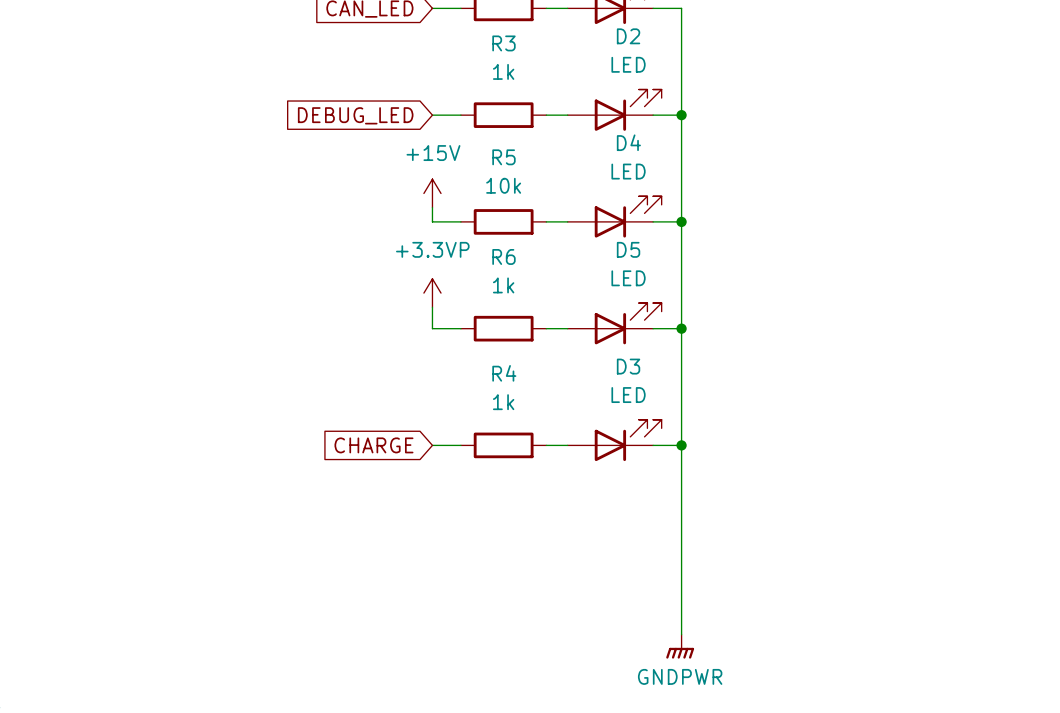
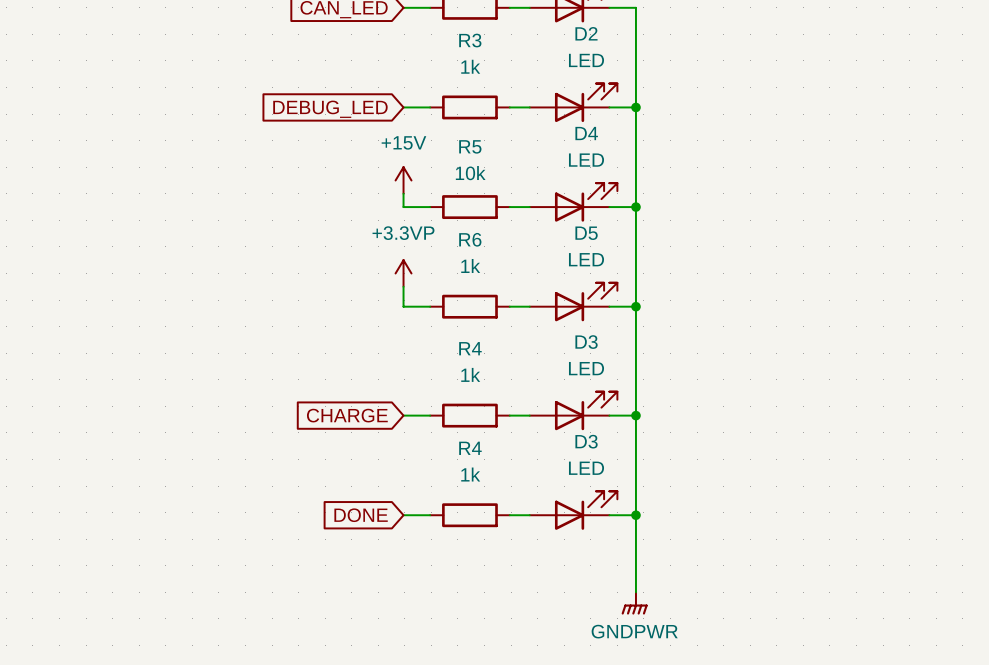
D3: none -> LED (573, 510)
global label: none -> DONE (361, 515)
wire: none -> (403, 515) (430, 515)
R4: none -> 1k (469, 515)
wire: none -> (509, 515) (529, 515)
wire: none -> (609, 515) (635, 515)
junction: none -> (635, 515)

